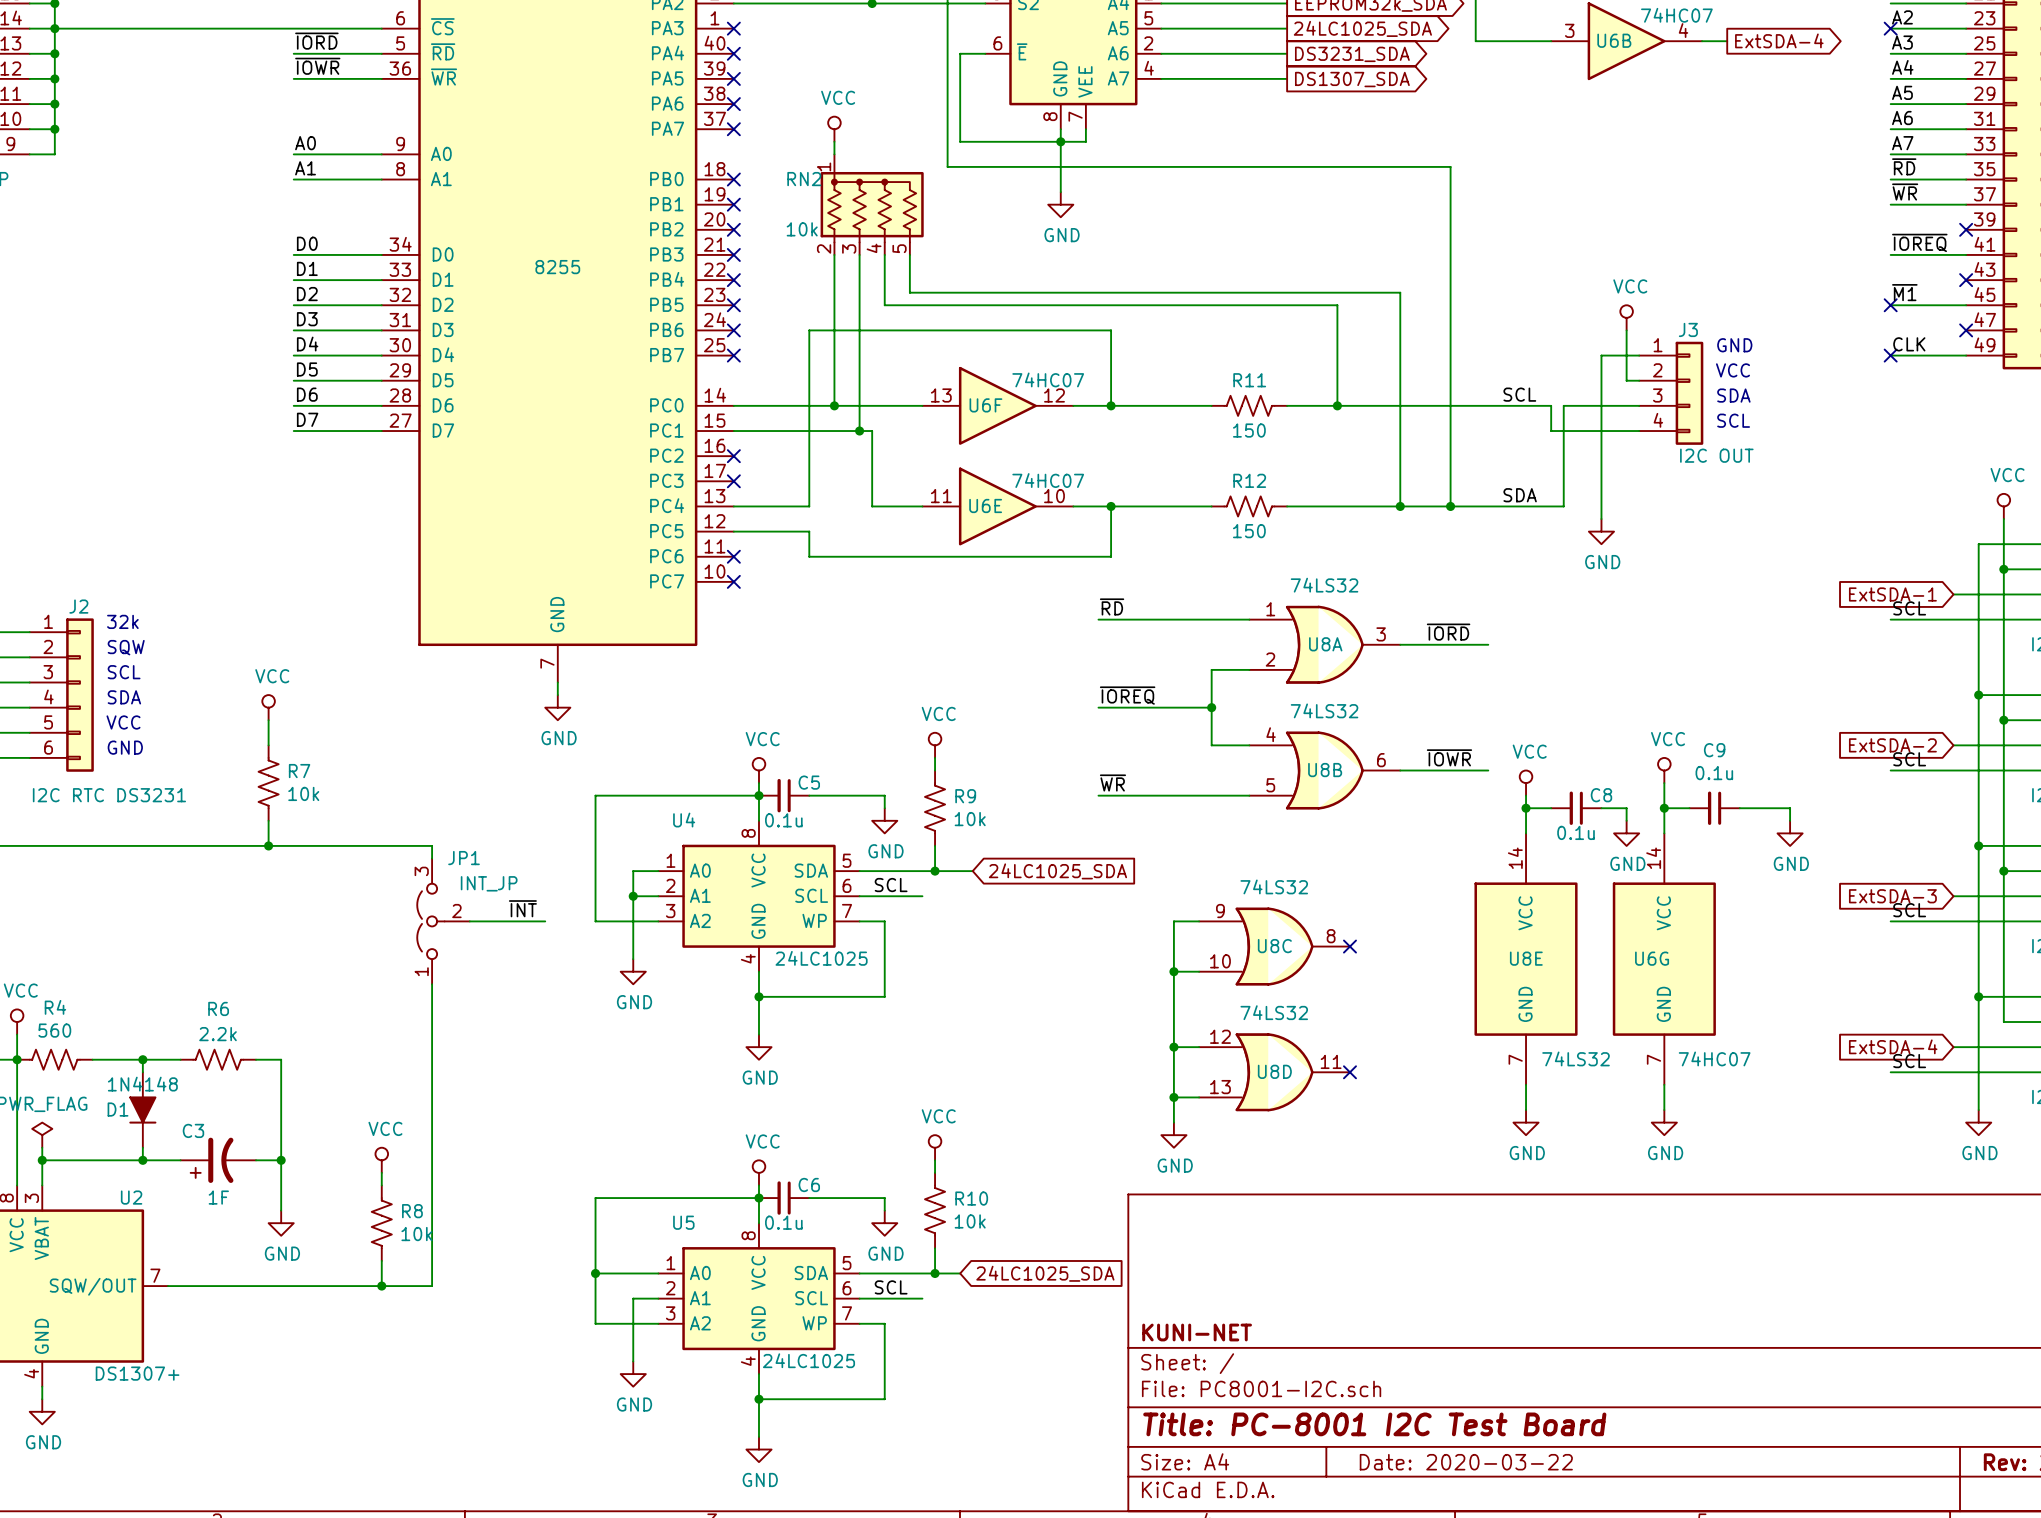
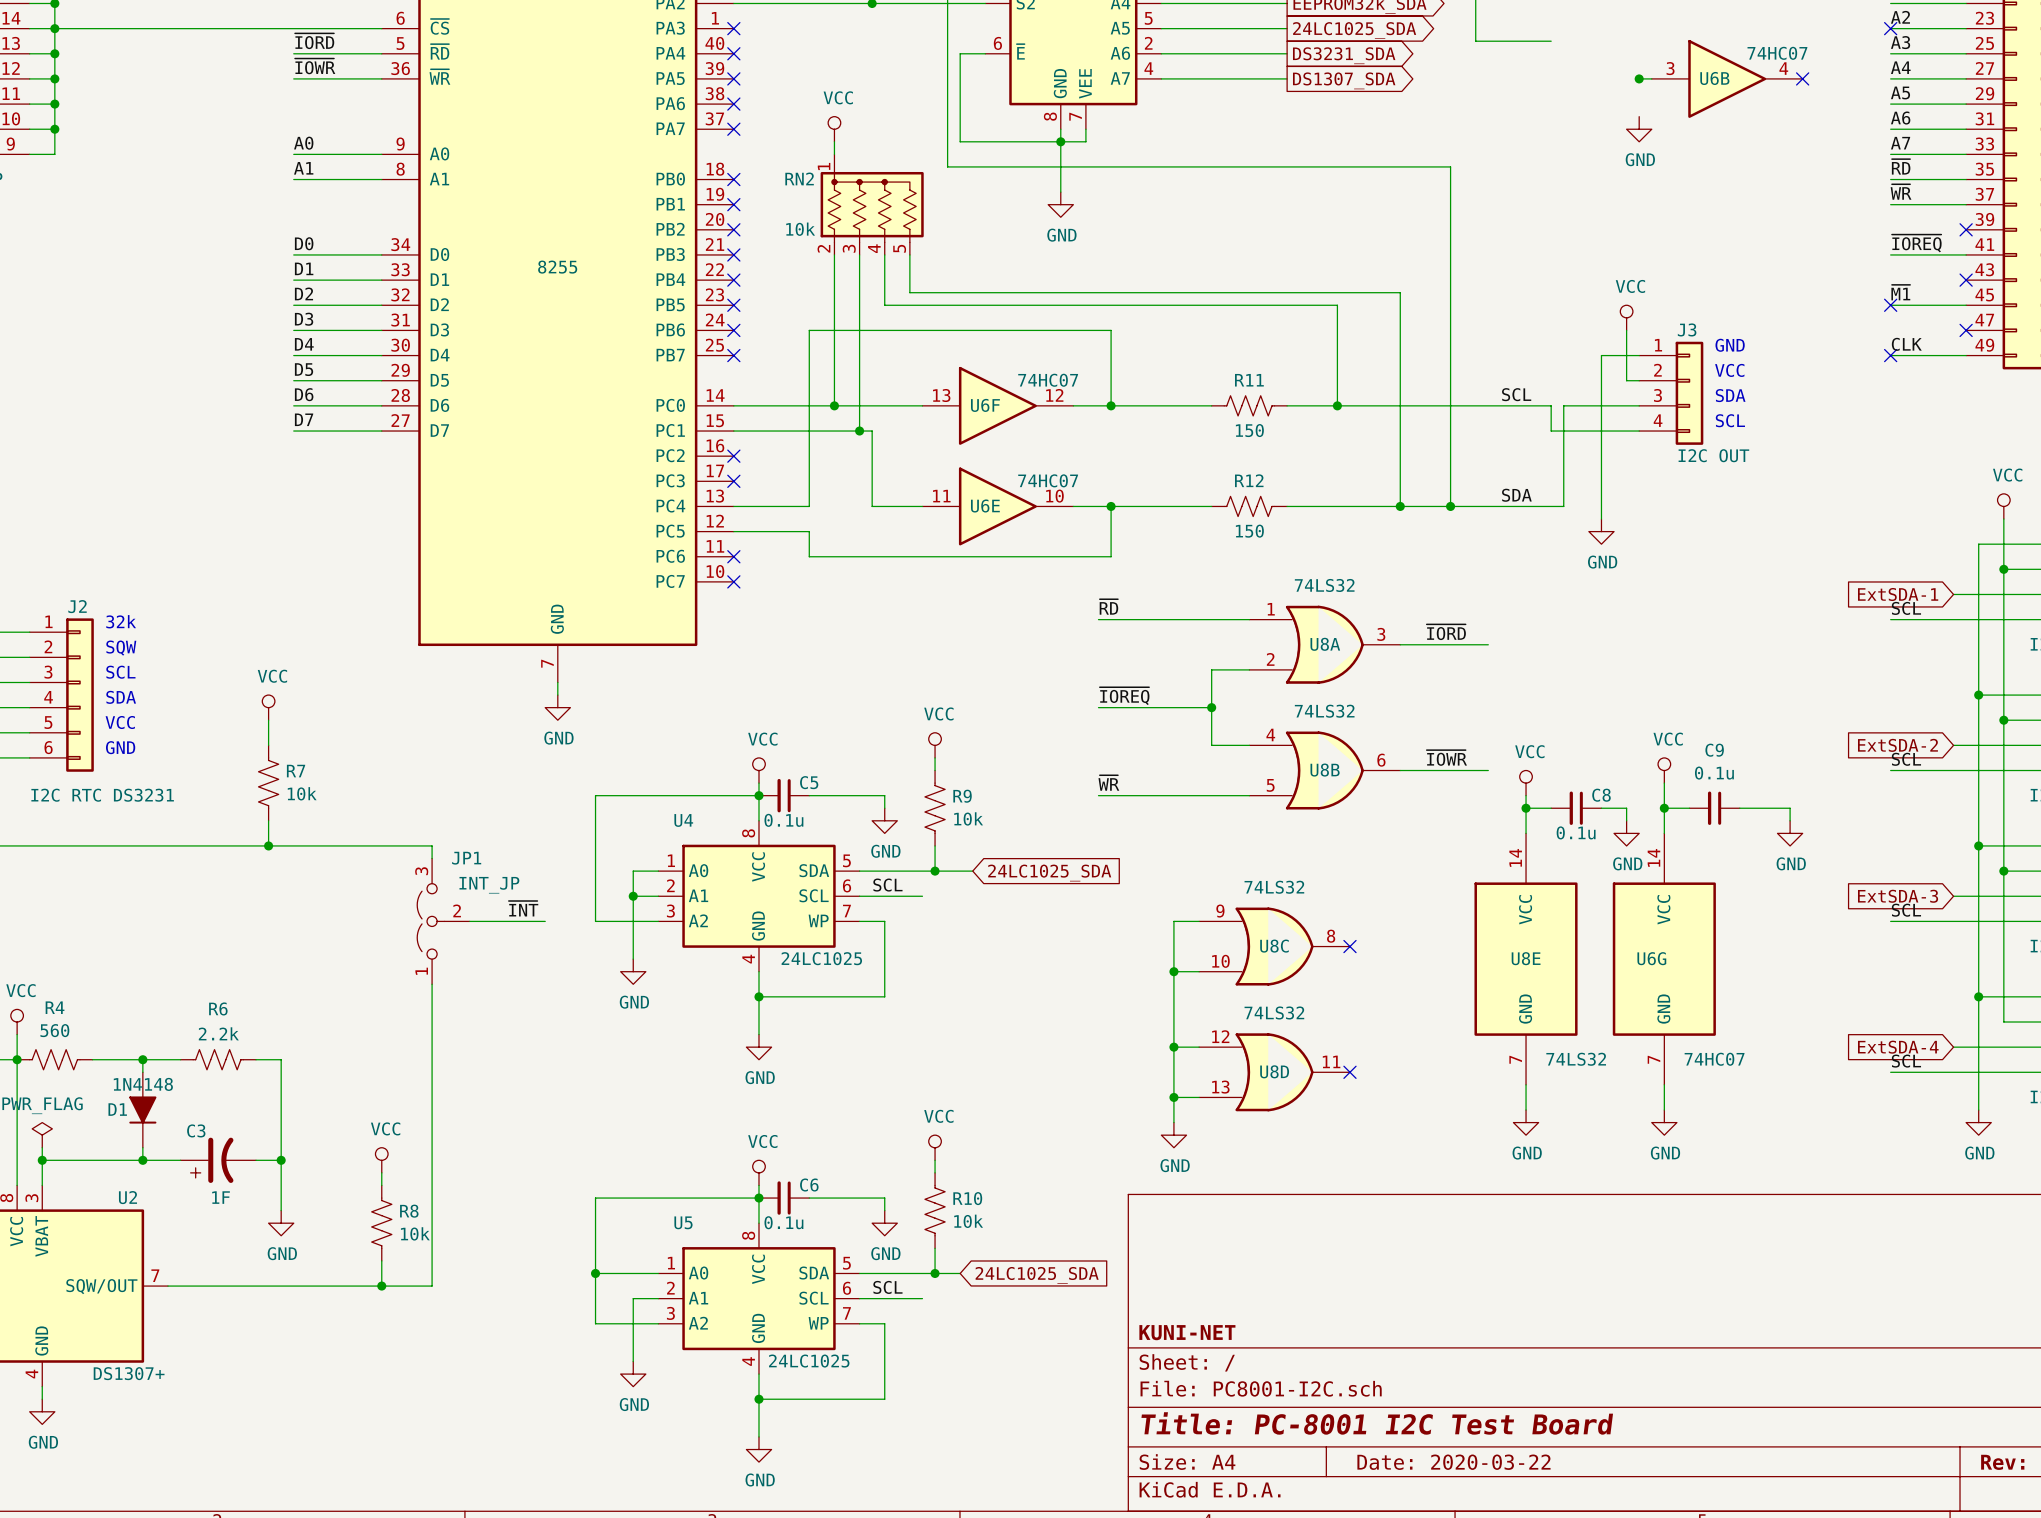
global label: ExtSDA-4 (1779, 40) -> none
U6B position: (1626, 41) -> (1727, 78)
wire: (1702, 41) (1727, 41) -> none
wire: none -> (1639, 78) (1651, 78)
junction: none -> (1639, 78)
no-connect mark: none -> (1802, 78)
power symbol: none -> GND (1639, 129)

